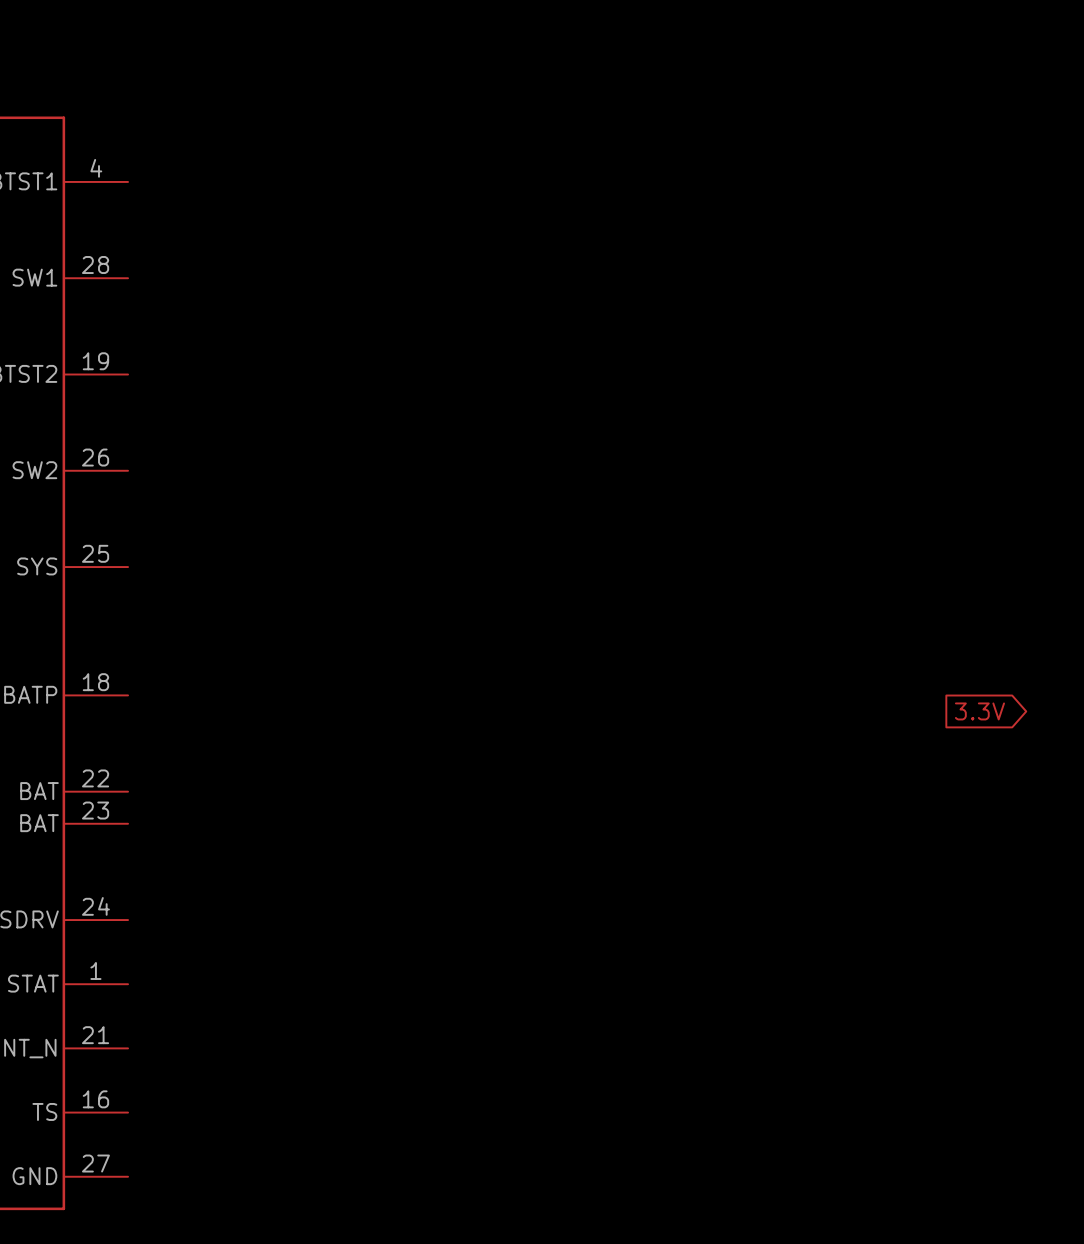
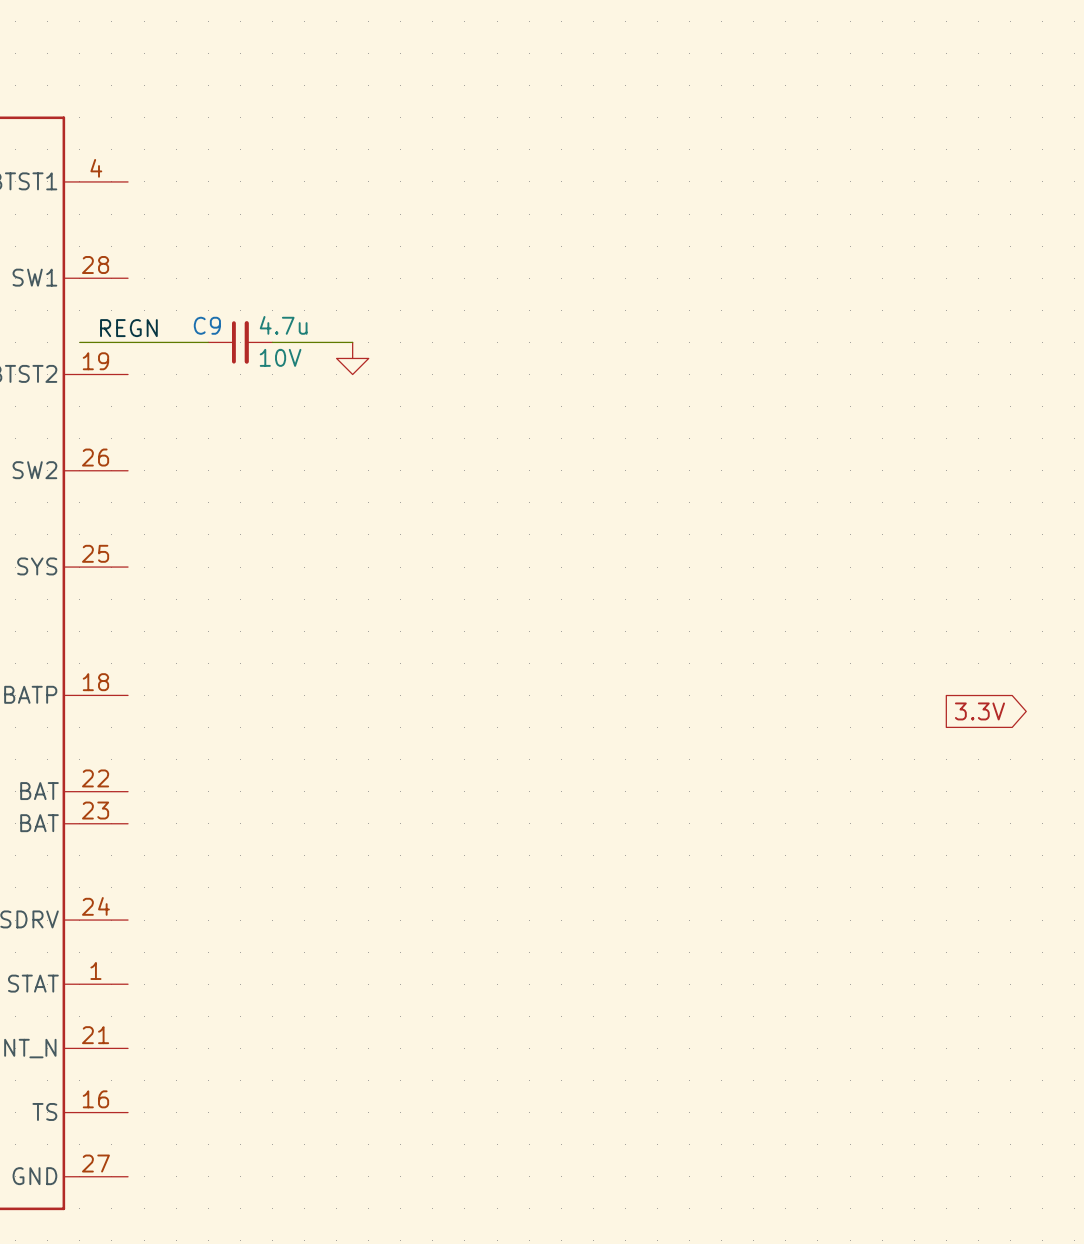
label: none -> REGN (128, 328)
wire: none -> (79, 342) (208, 342)
C9: none -> 4.7u (240, 342)
wire: none -> (272, 342) (352, 342)
power symbol: none -> (352, 358)

